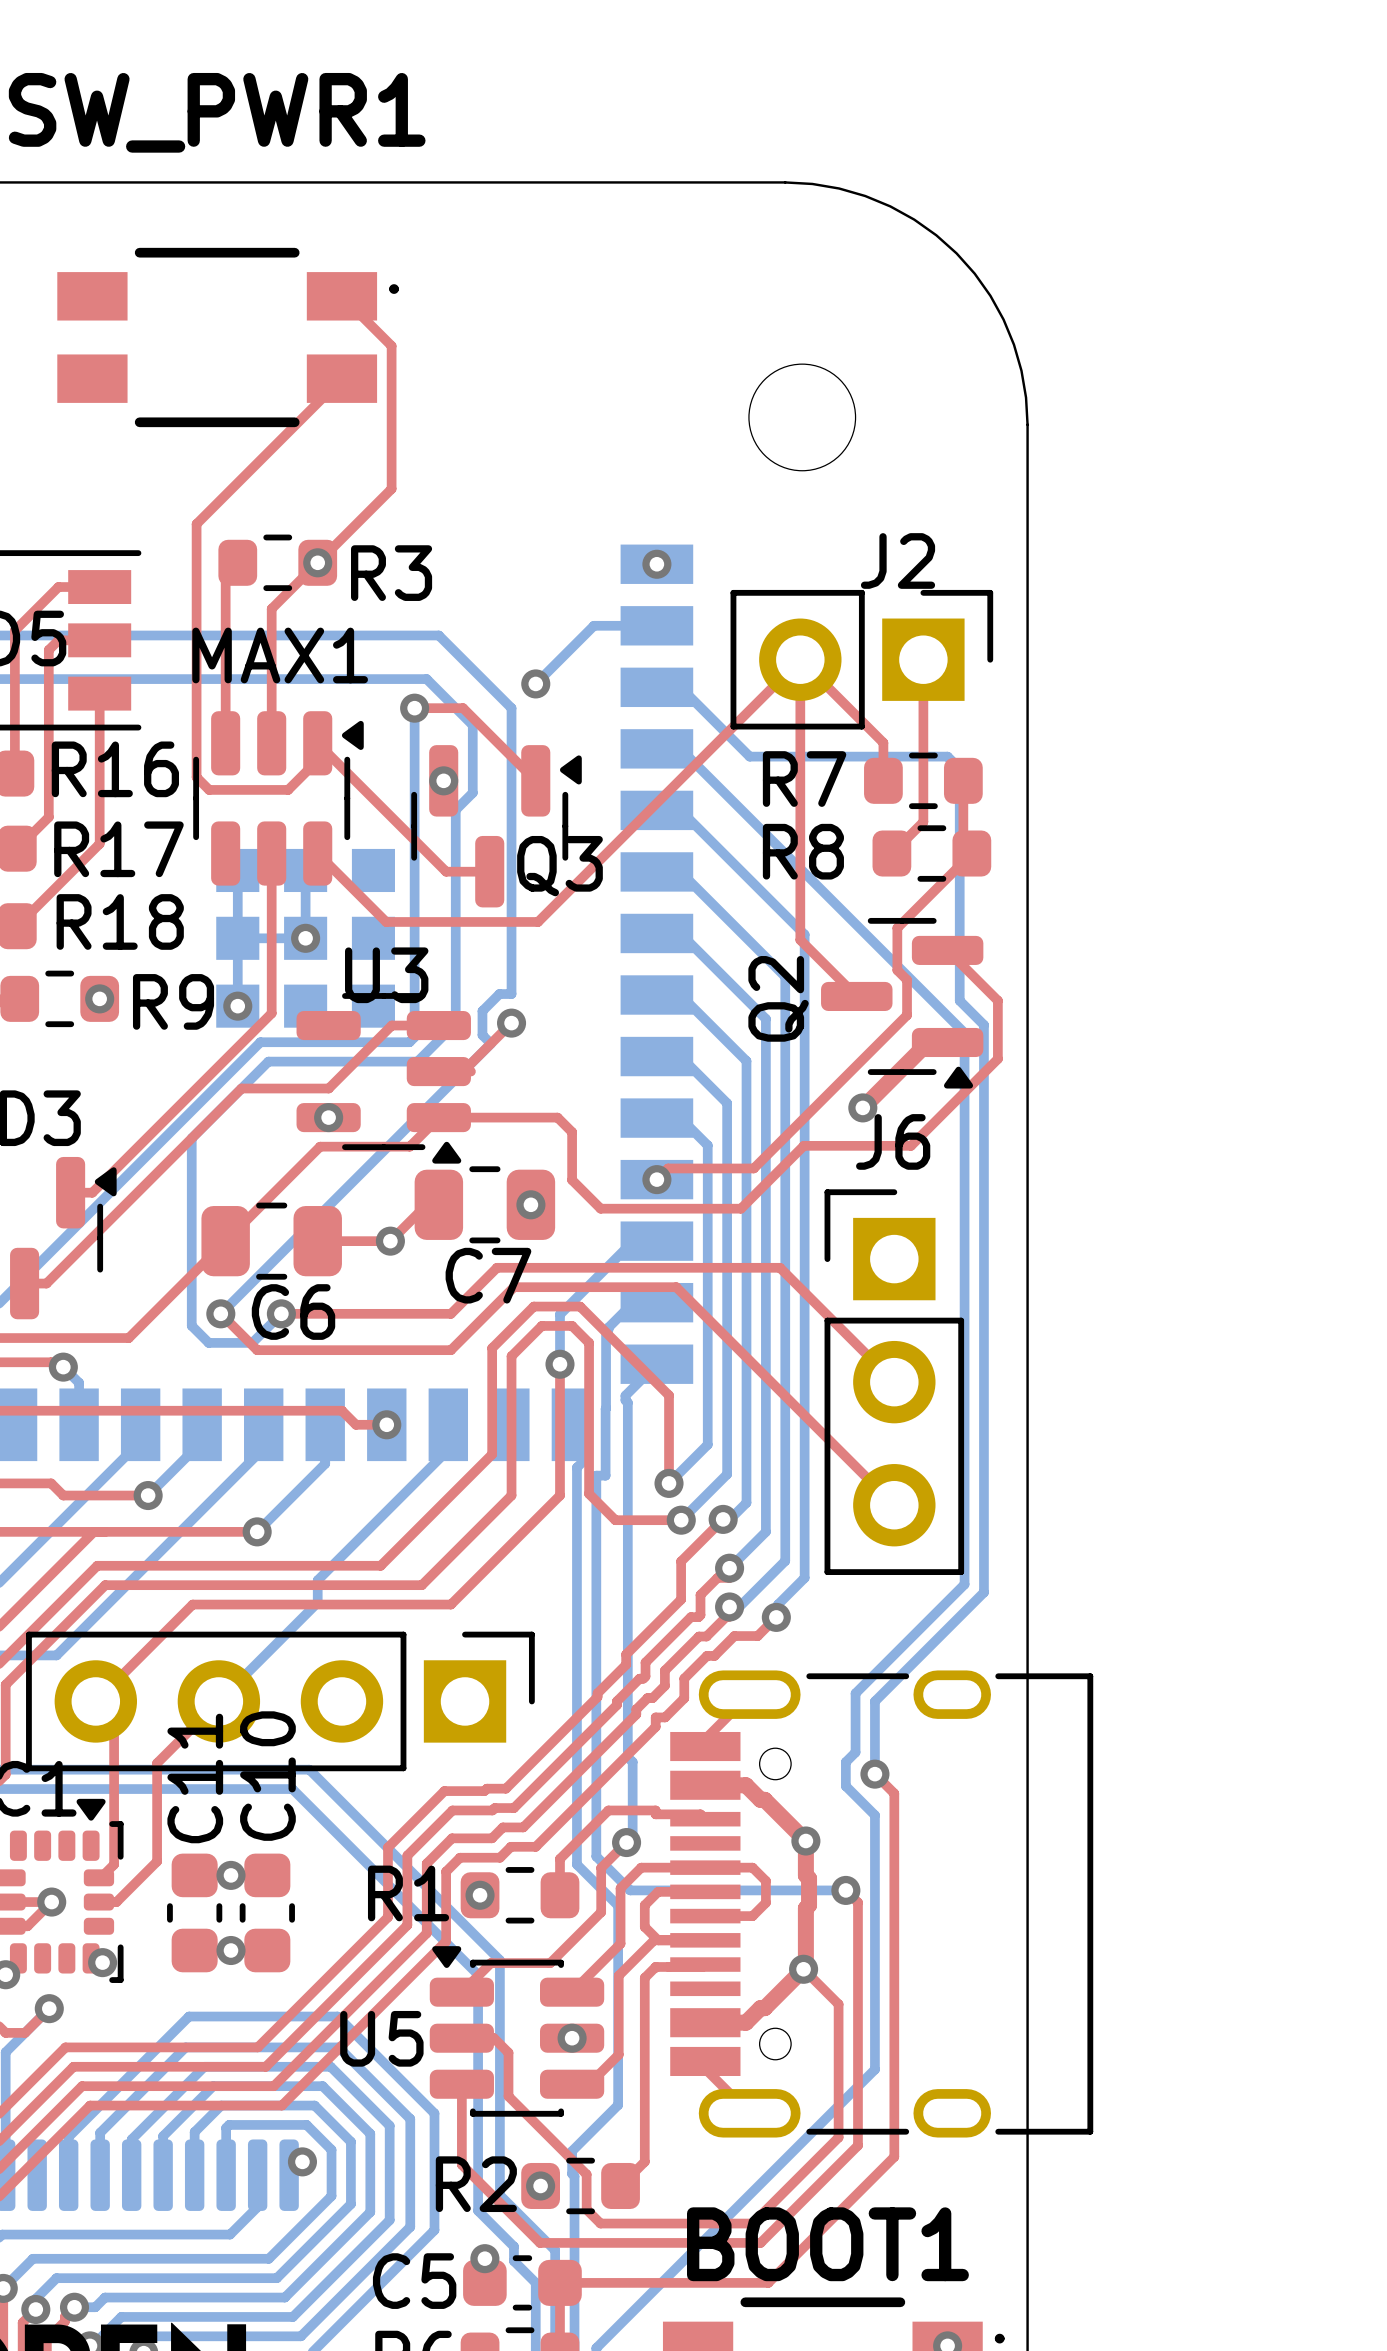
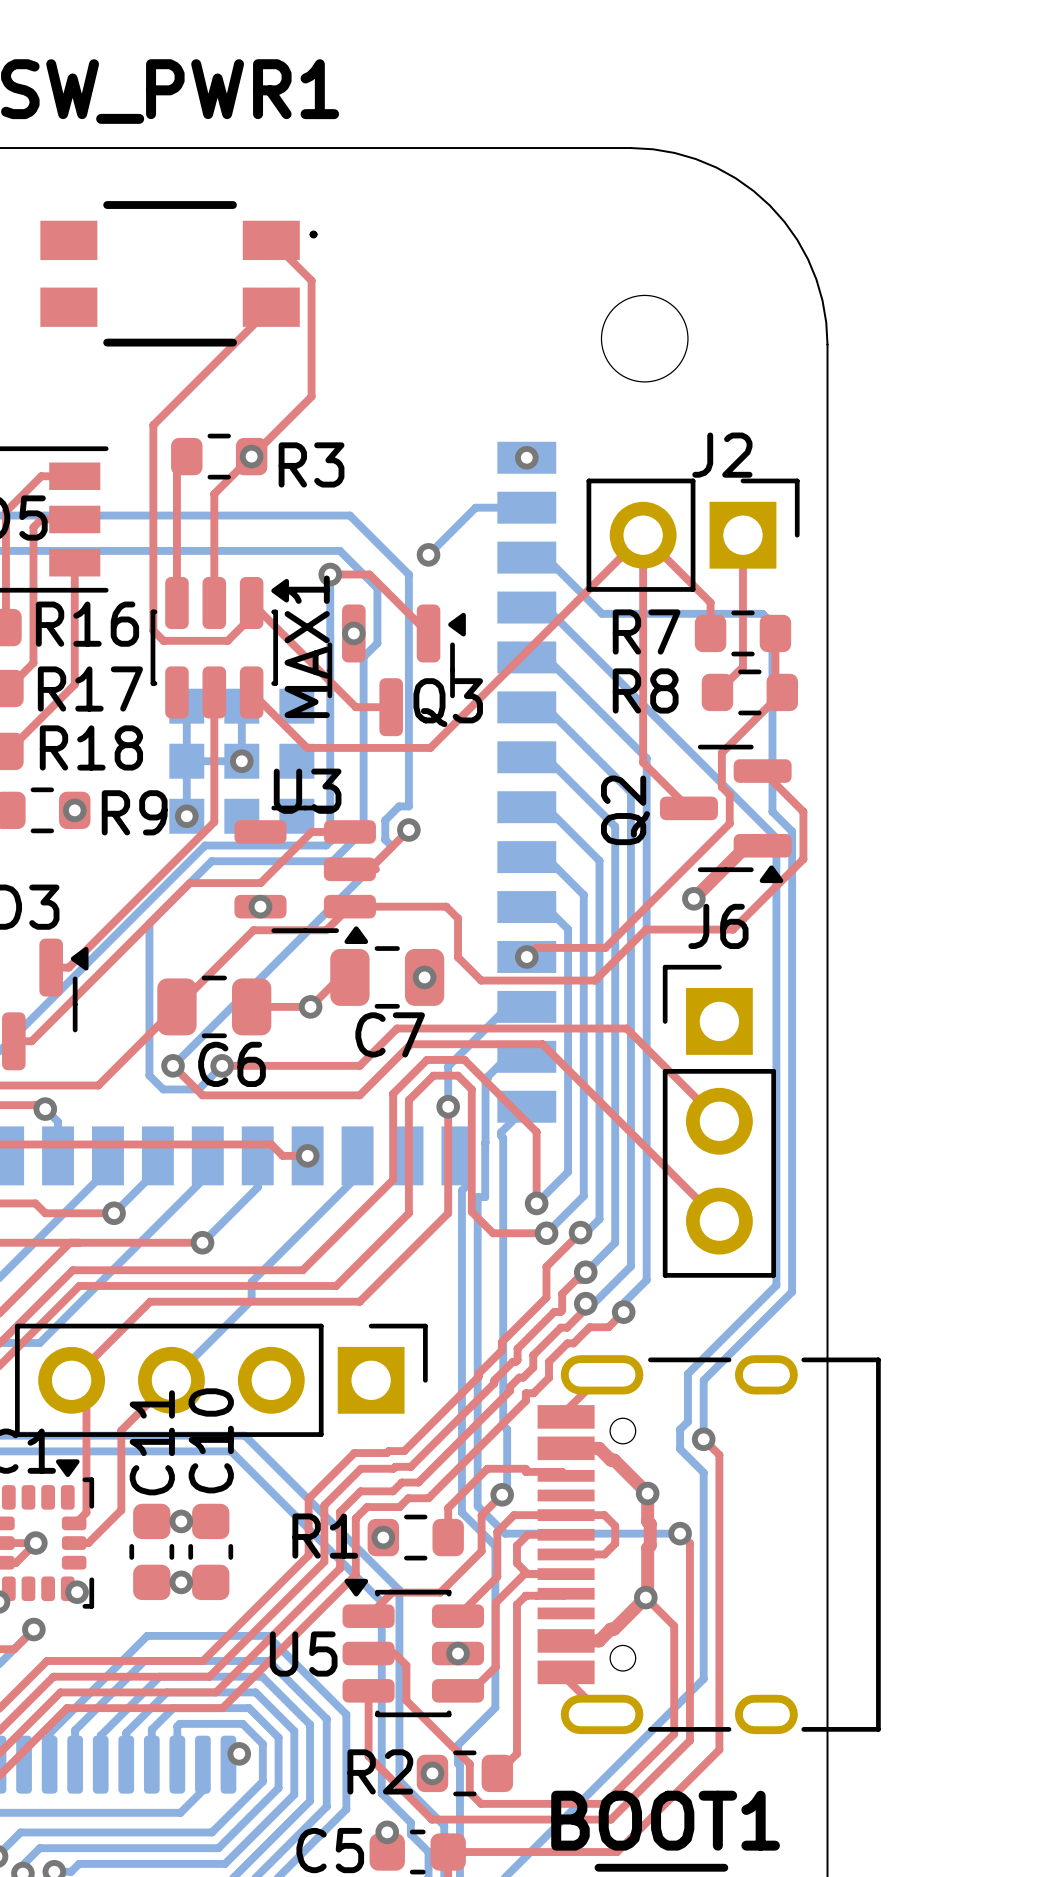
MAX1 name rotation: 0° (280, 655) -> 90° counterclockwise (307, 646)
MAX1 footprint: [193, 711, 364, 886] -> [150, 576, 289, 719]

